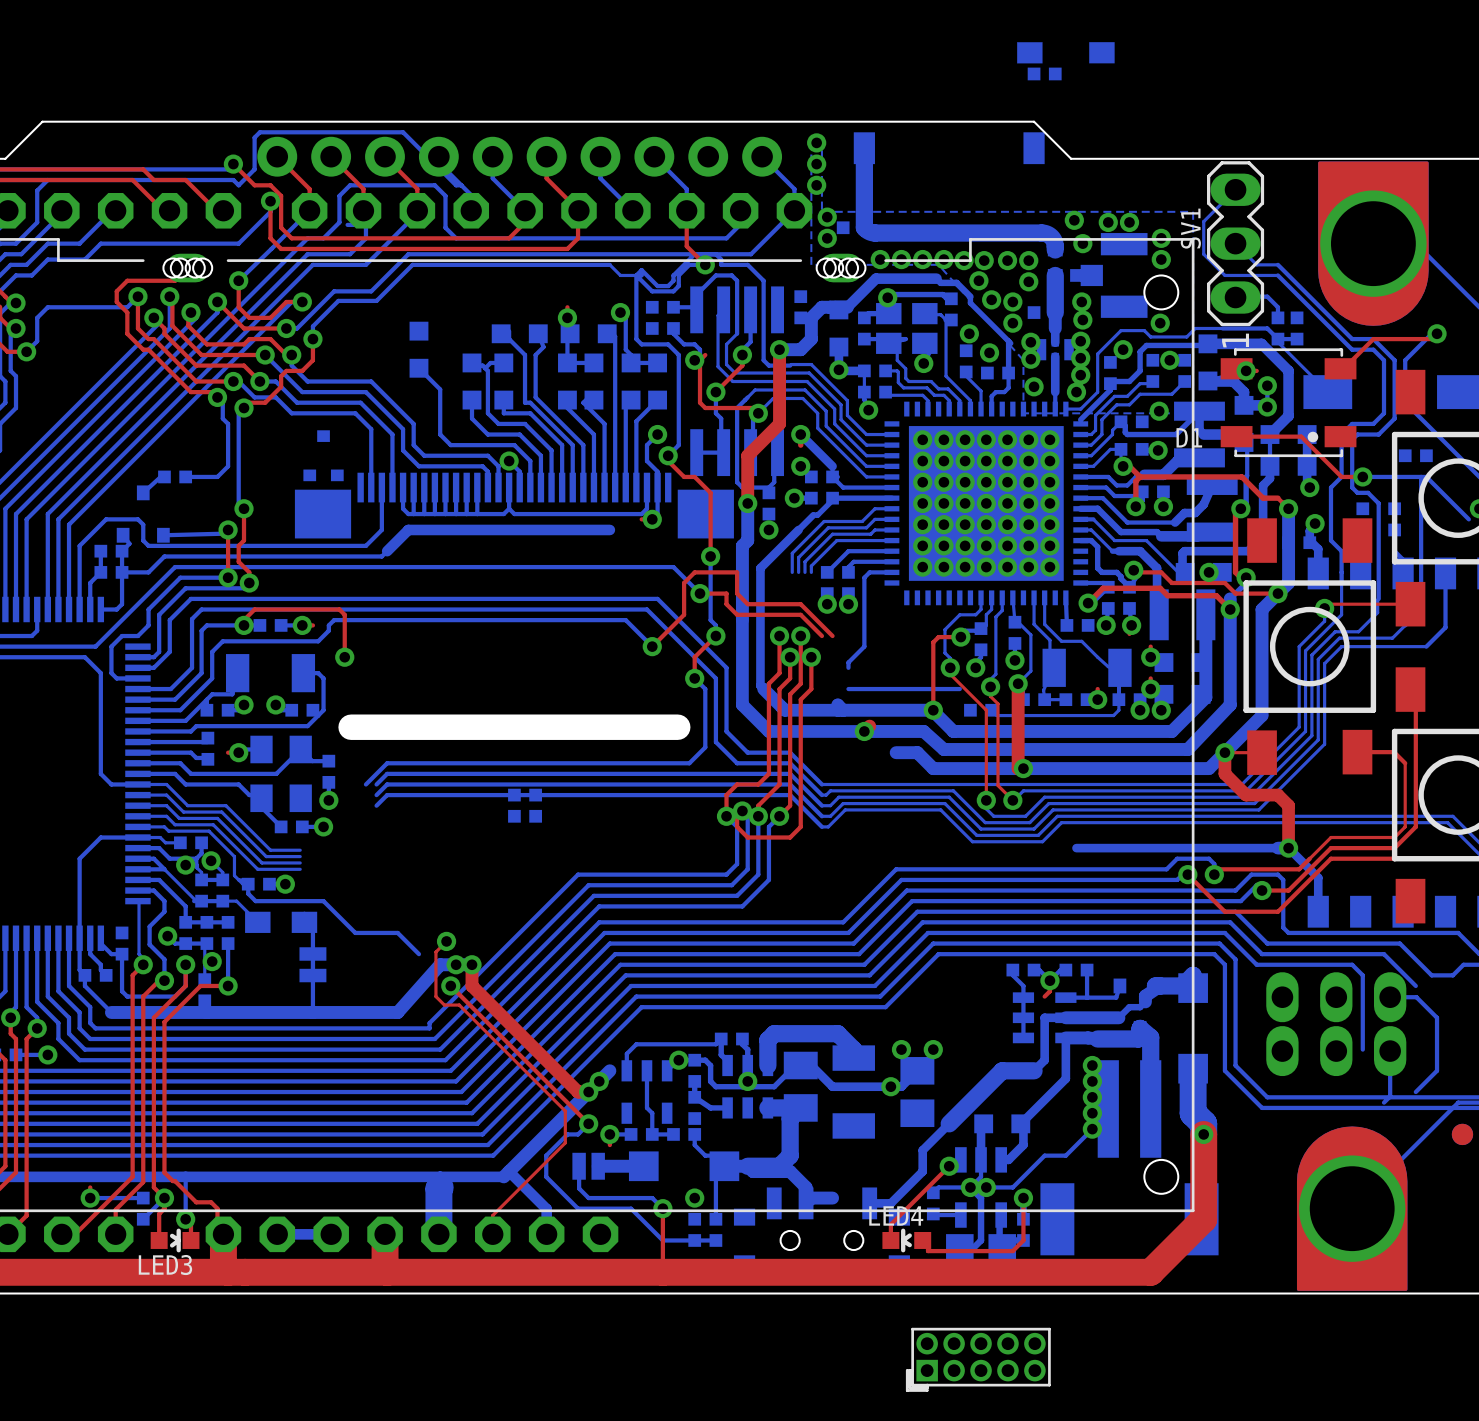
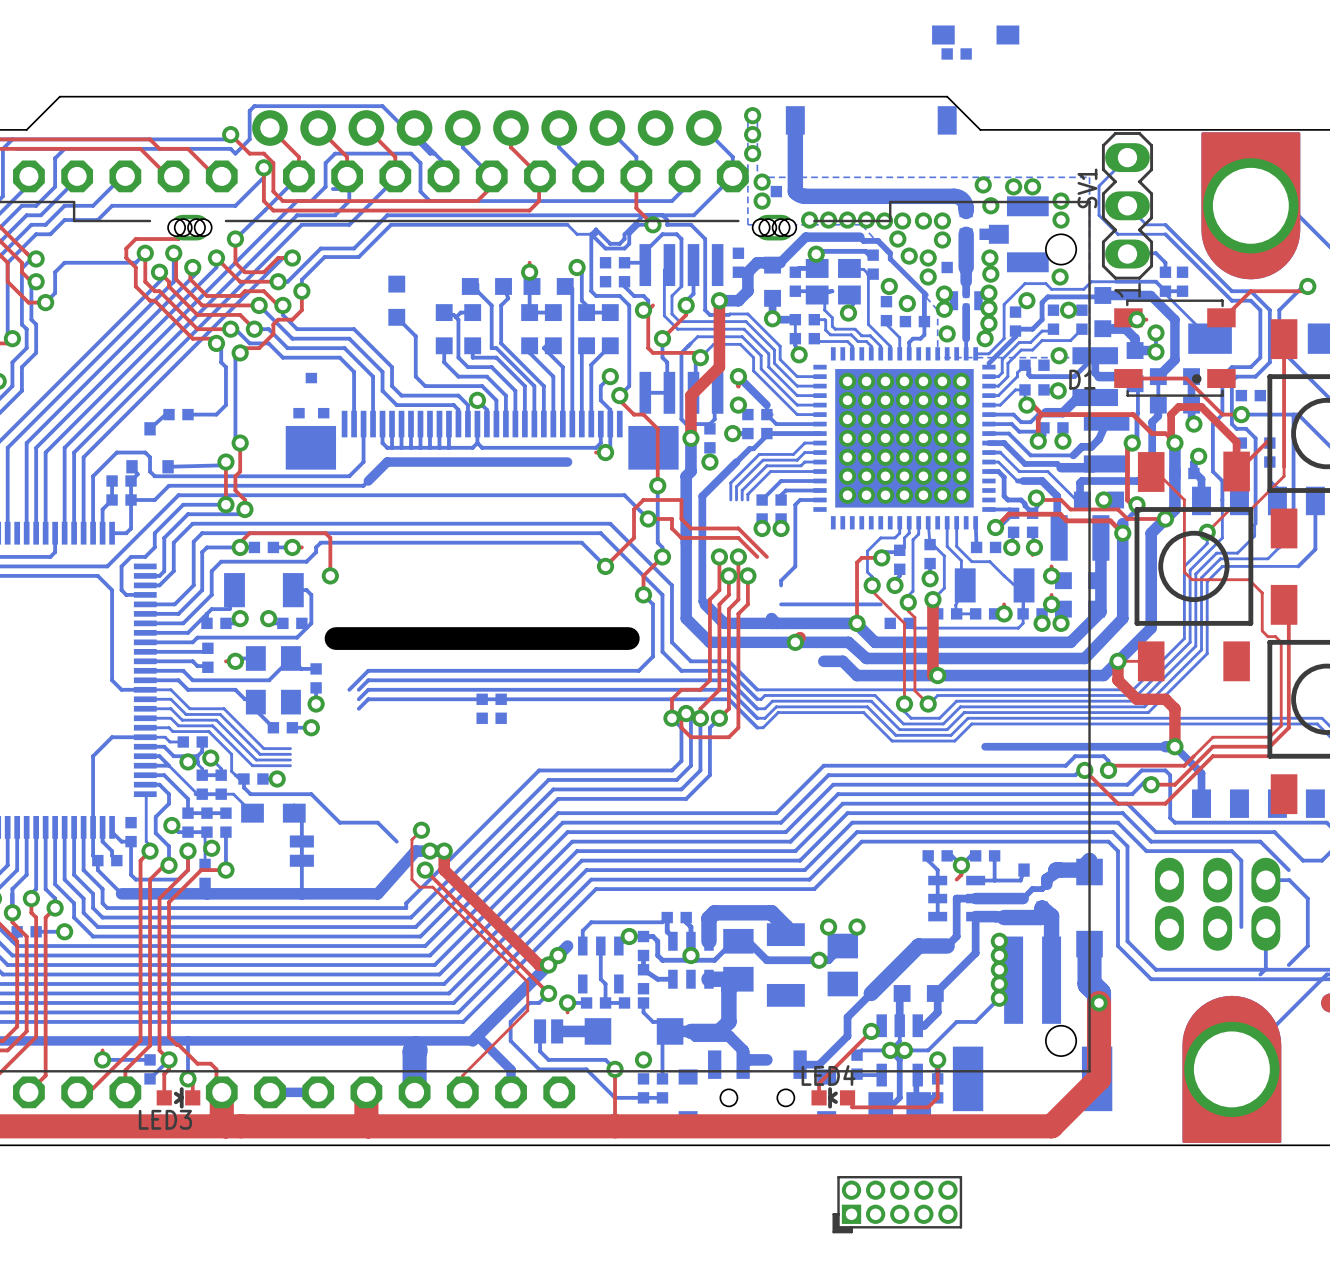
part position: (1415, 455) -> (1250, 395)
top track: none -> (1171, 439) (1171, 414) (1178, 406) (1201, 406) (1236, 442) (1236, 471) (1269, 439)
top track: (1328, 604) (1410, 604) -> (1211, 528) (1229, 509) (1250, 509) (1284, 476) (1284, 339)
top track: (1357, 752) (1394, 752) (1405, 763) (1405, 826) -> (1151, 472) (1156, 472) (1184, 499) (1184, 572) (1192, 579) (1248, 579) (1262, 593) (1262, 630) (1267, 636) (1275, 636) (1281, 642) (1281, 725) (1279, 727)

